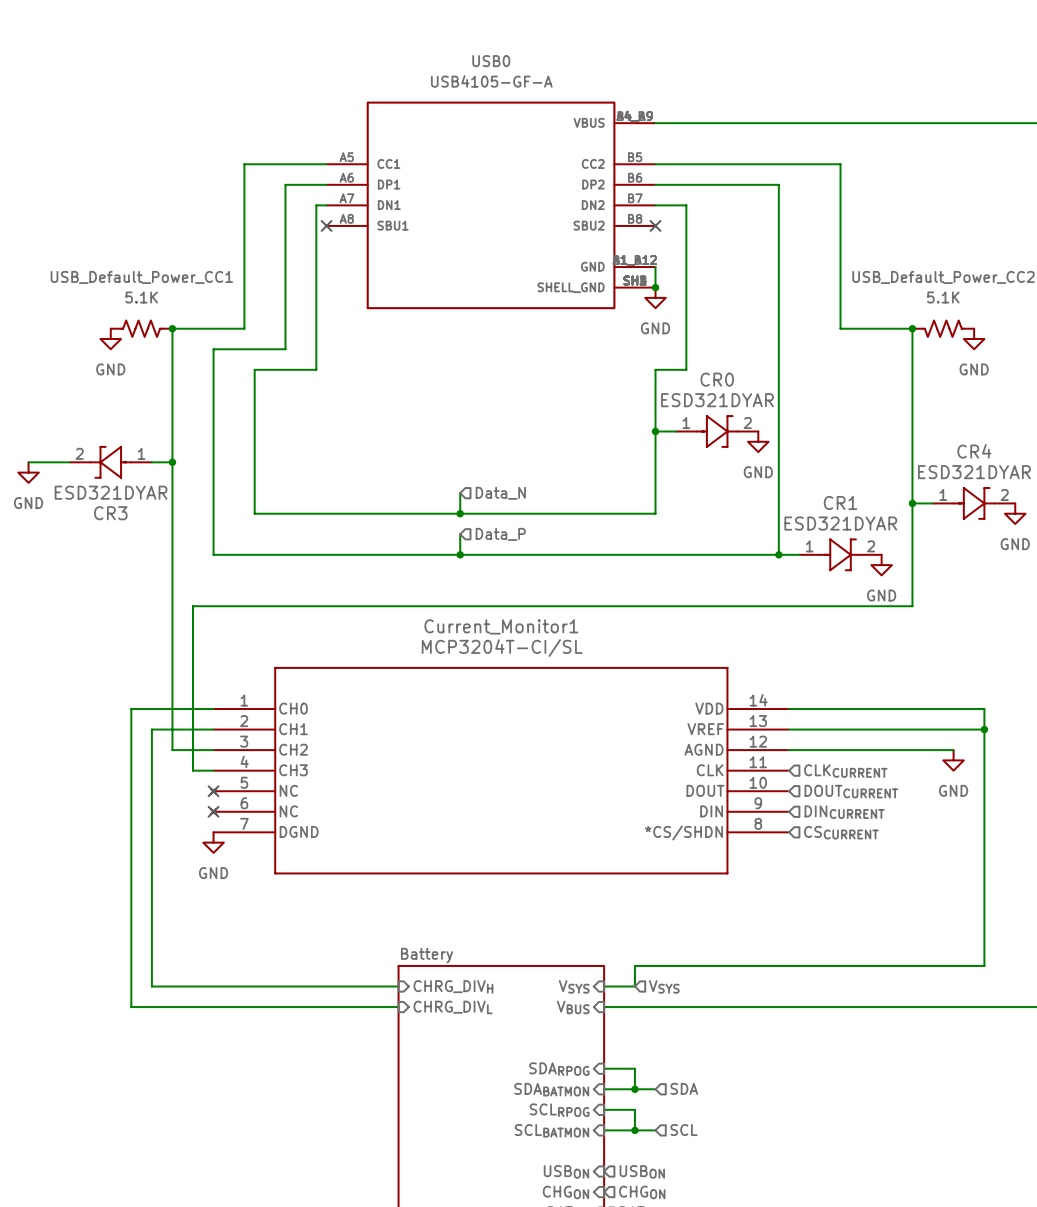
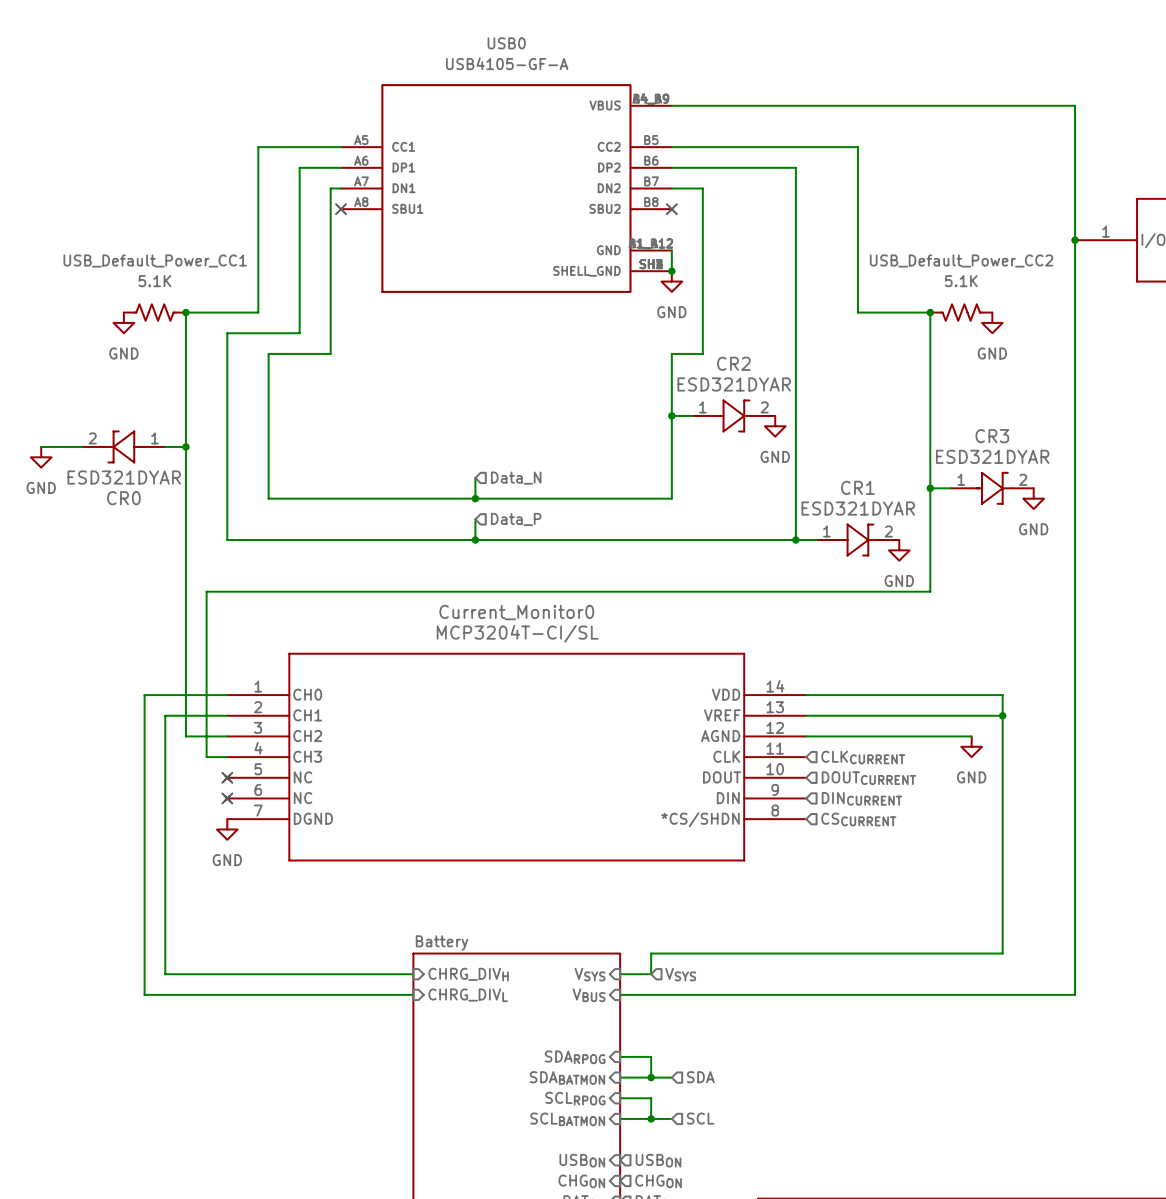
CR0 name: CR0 (717, 379) -> CR2 (733, 363)
CR4 name: CR4 (974, 451) -> CR3 (992, 436)
CR3 name: CR3 (110, 513) -> CR0 (123, 498)
Current_Monitor1 name: Current_Monitor1 (501, 626) -> Current_Monitor0 (516, 612)

